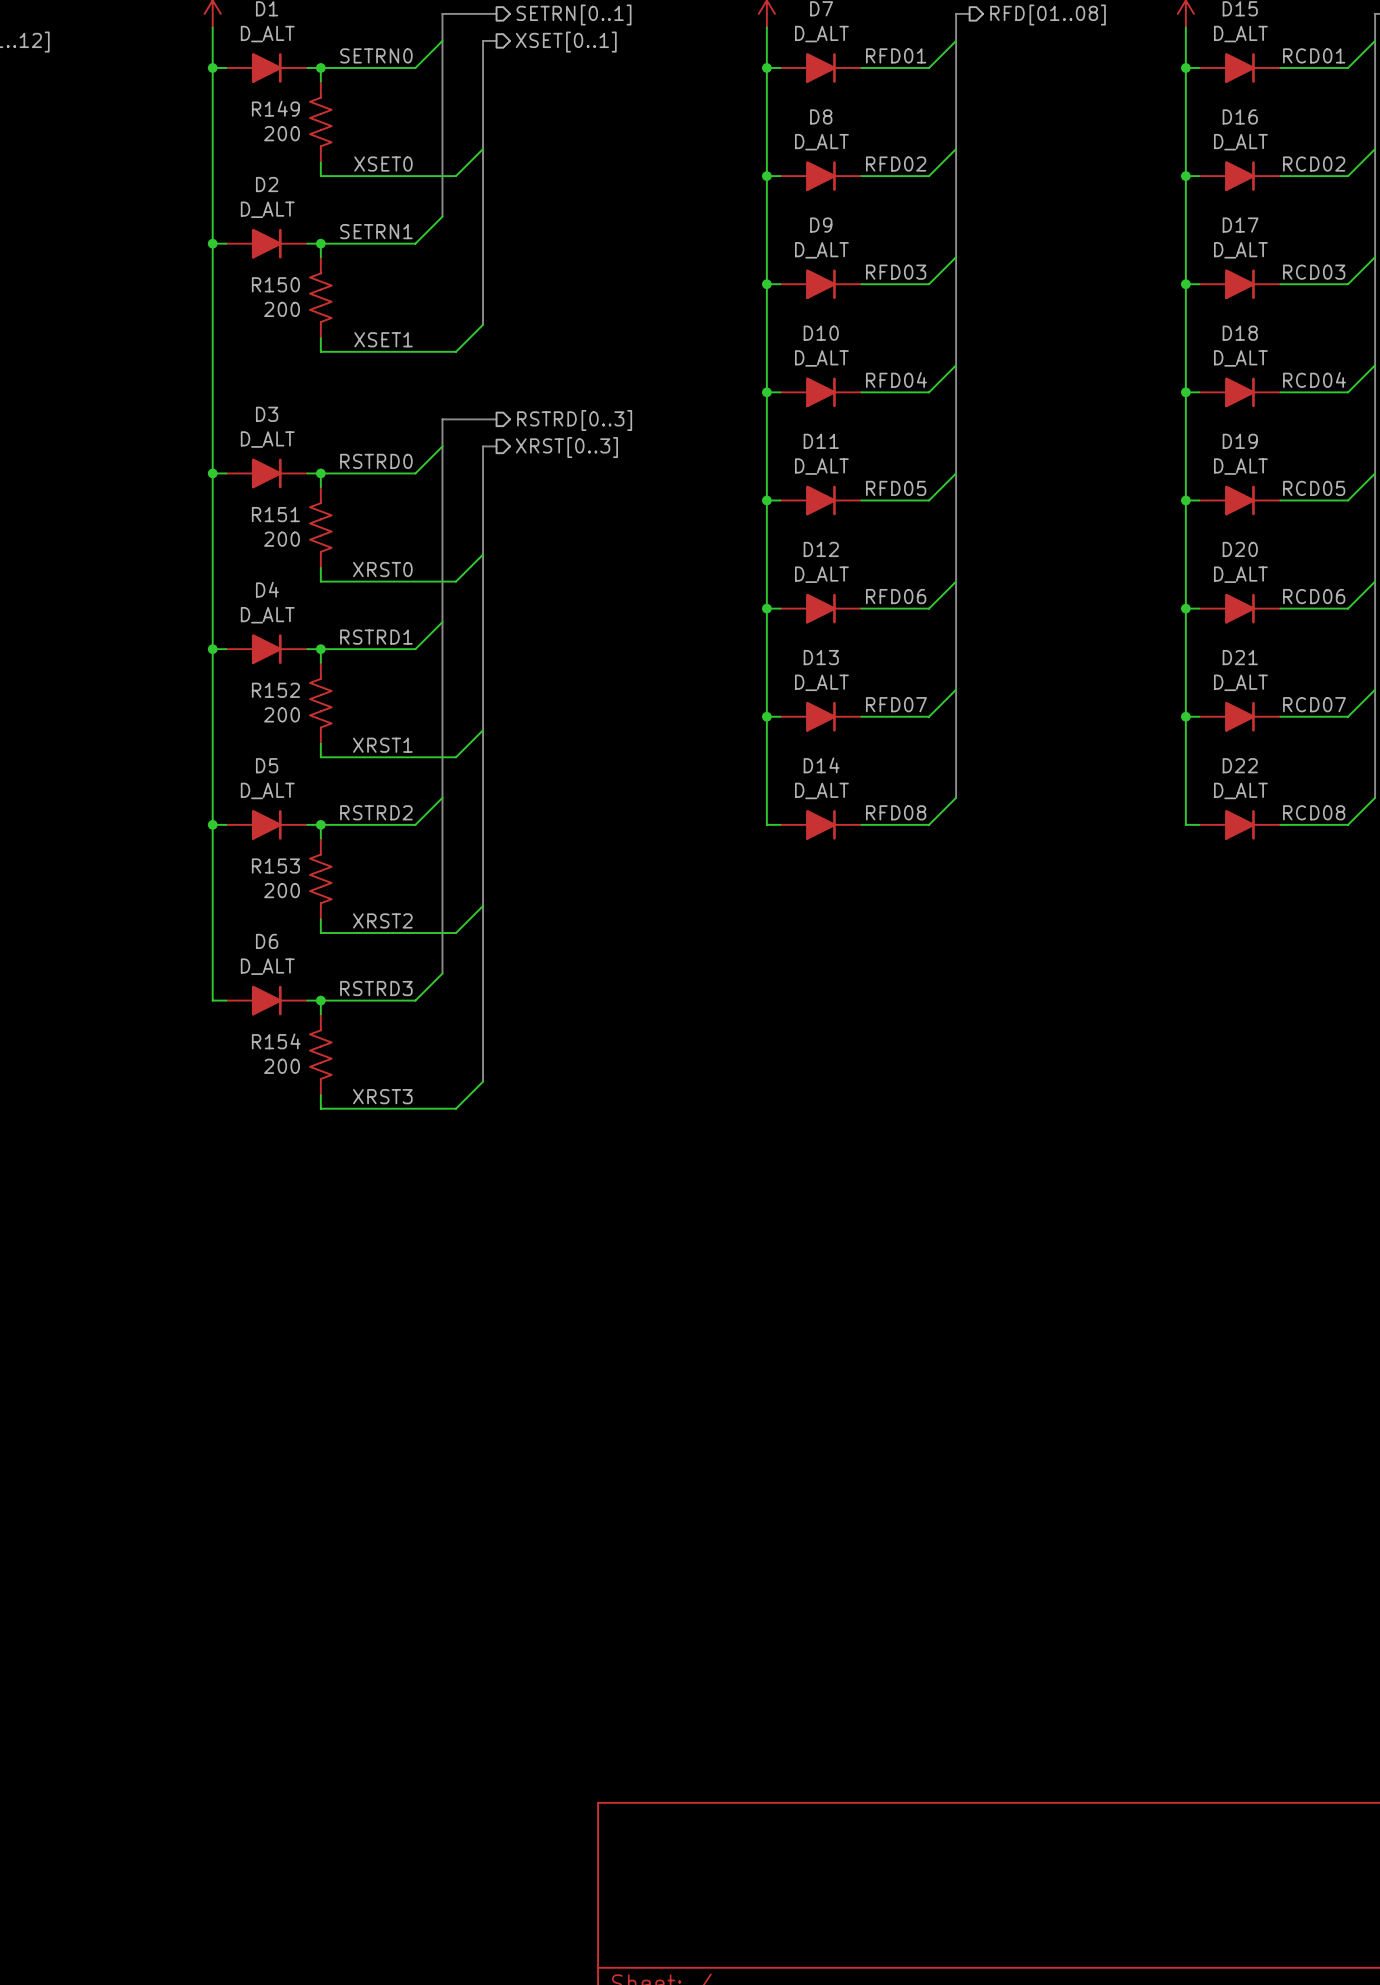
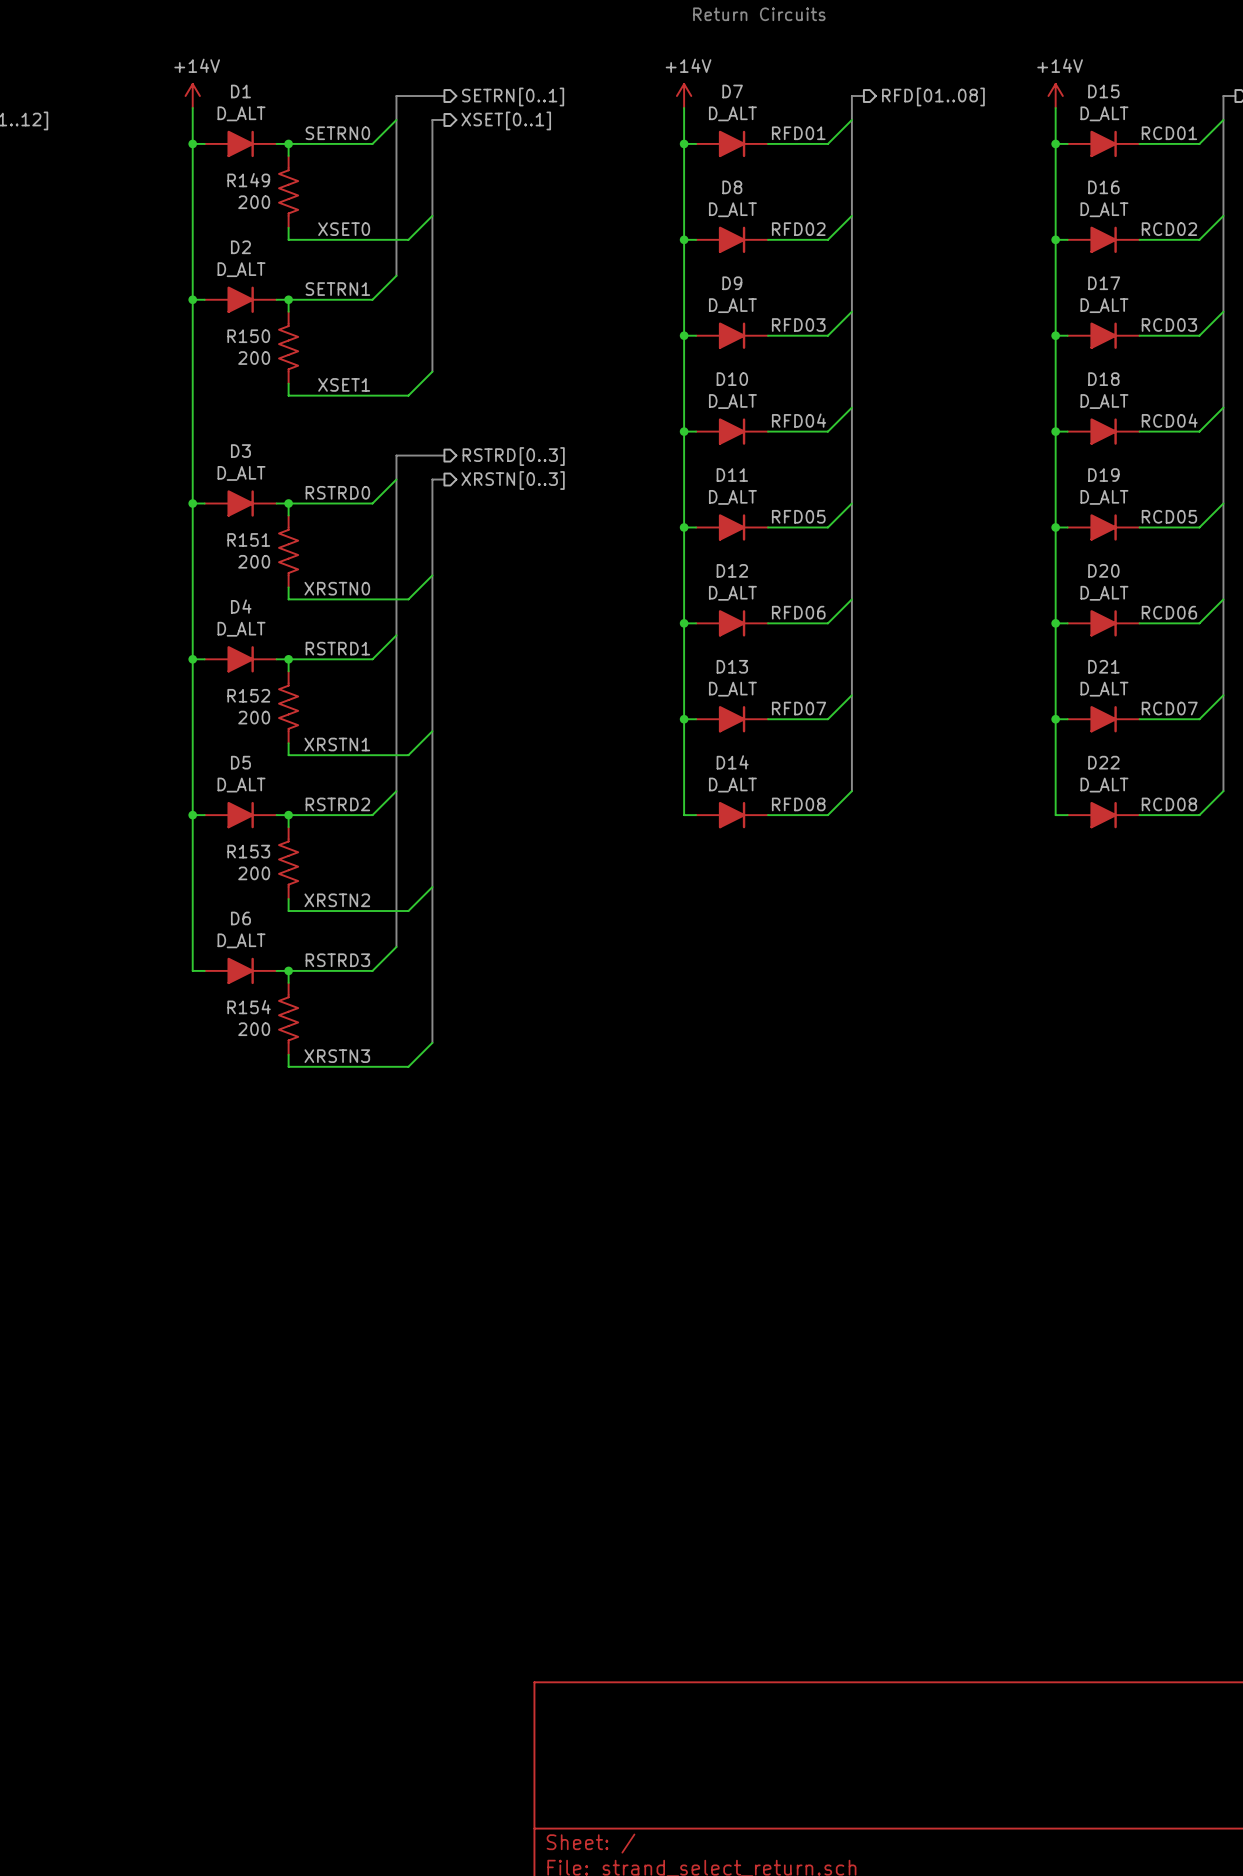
hierarchical label: XRST[0..3] (566, 447) -> XRSTN[0..3] (513, 480)
label: XRST0 (382, 569) -> XRSTN0 (337, 588)
label: XRST1 (382, 745) -> XRSTN1 (337, 744)
label: XRST2 (382, 920) -> XRSTN2 (337, 900)
label: XRST3 (382, 1096) -> XRSTN3 (337, 1056)

